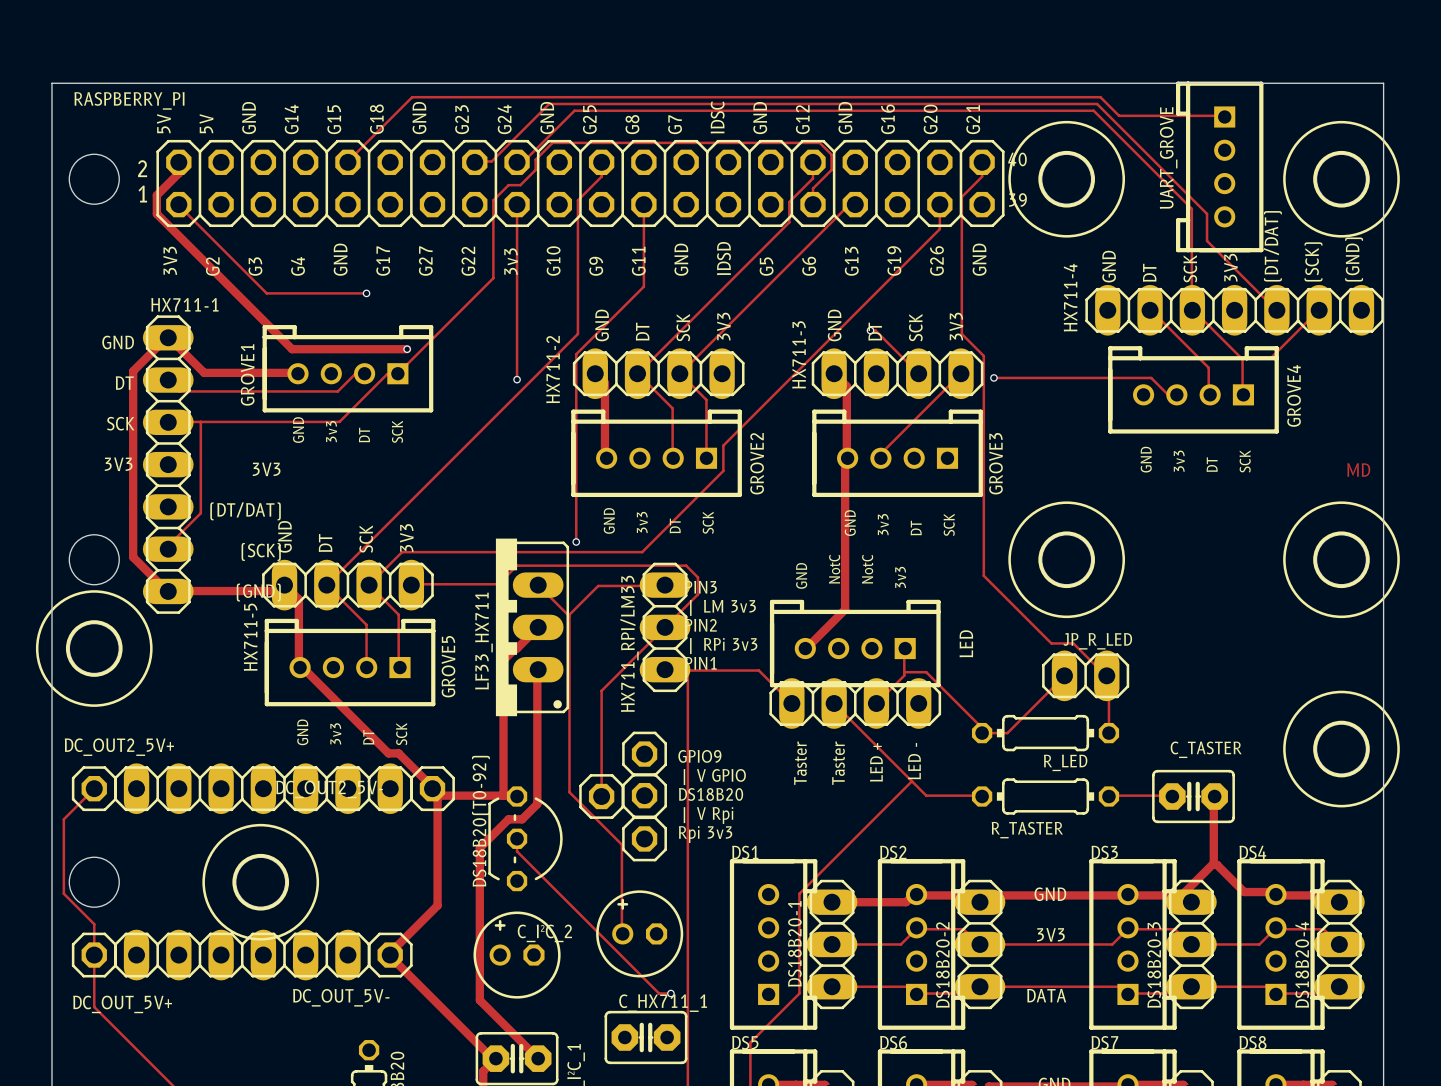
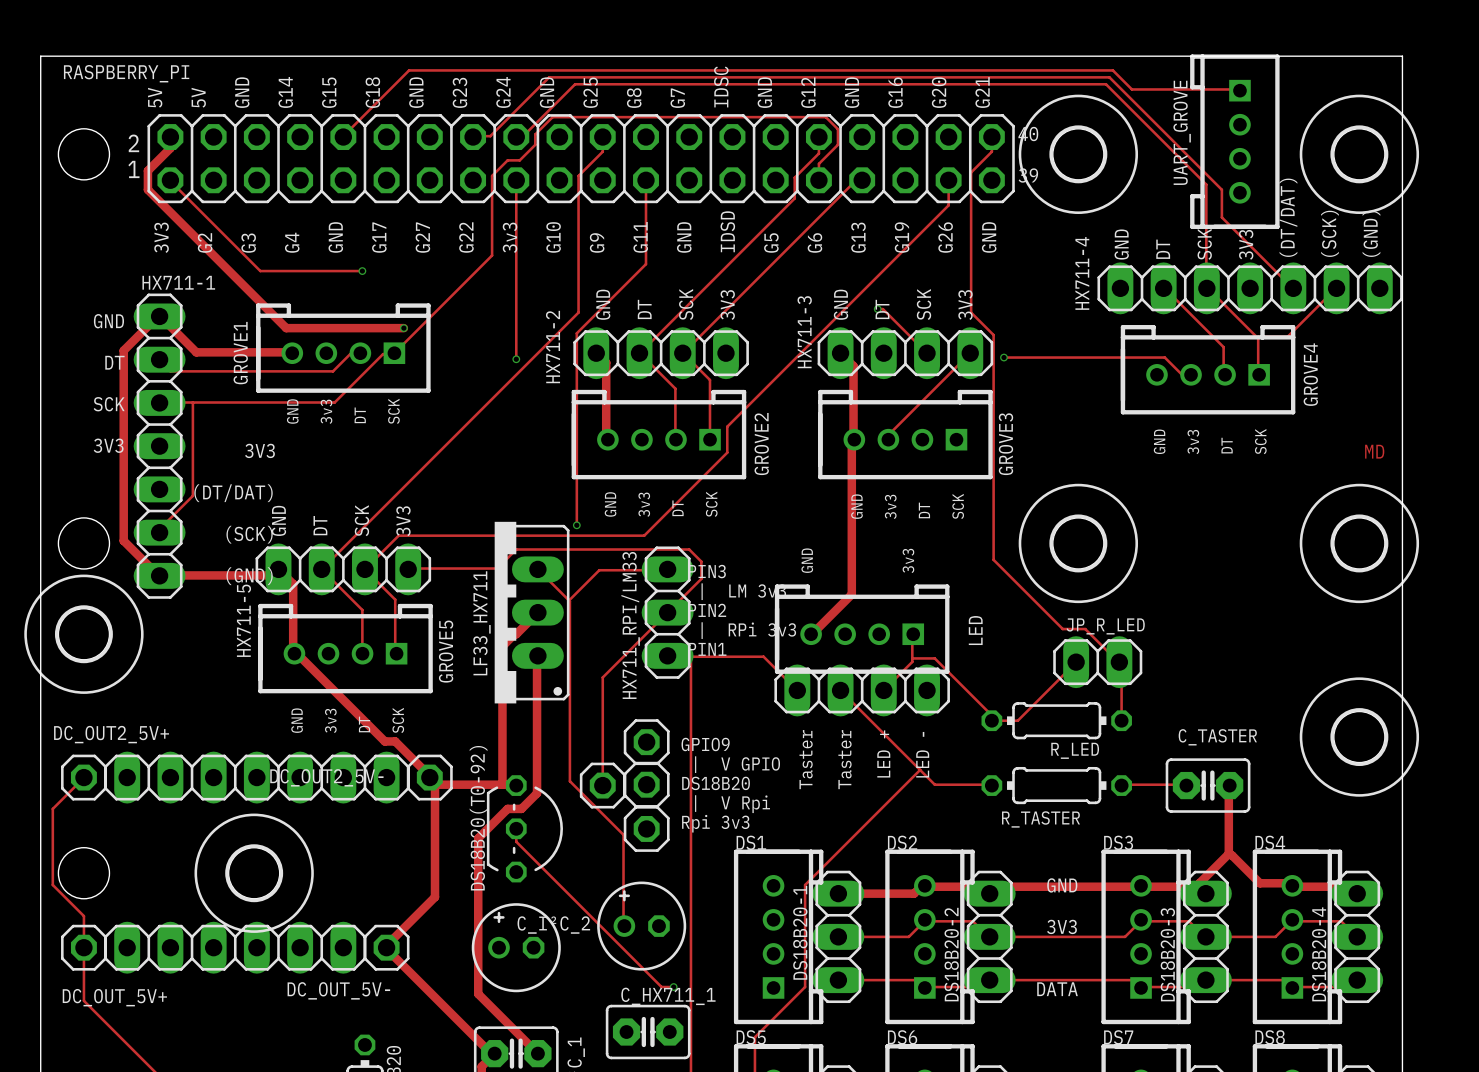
text: NotC (834, 569) -> none
text: NotC (867, 569) -> none

